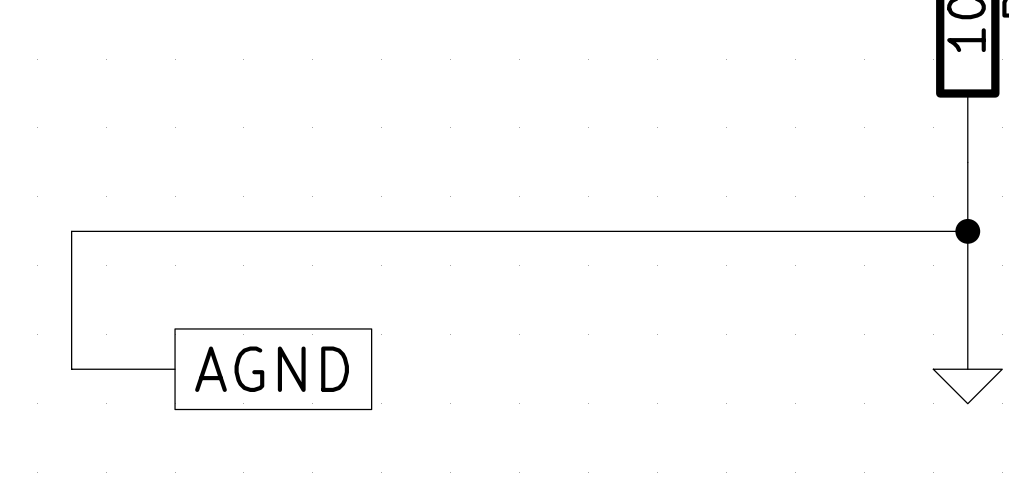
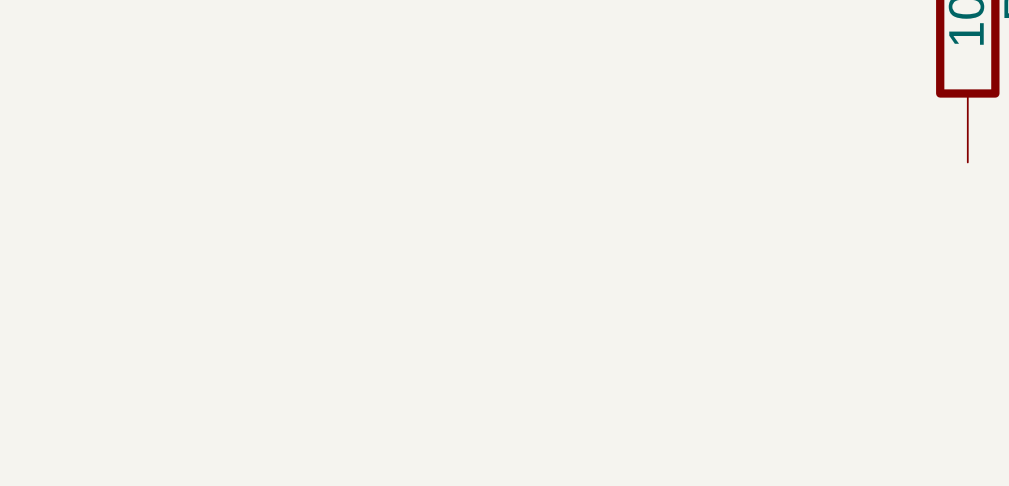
wire: (967, 162) (967, 369) -> none
wire: (967, 231) (71, 231) (71, 369) (175, 369) -> none
junction: (967, 231) -> none
global label: AGND (272, 369) -> none
power symbol: (967, 386) -> none

